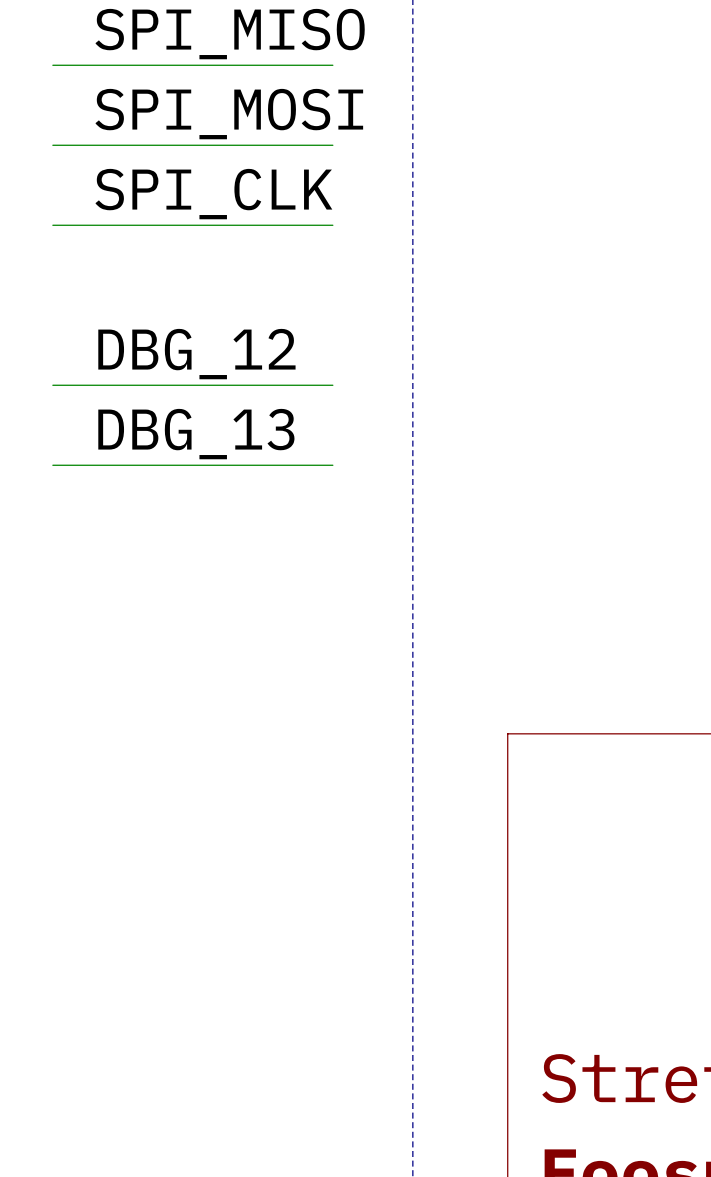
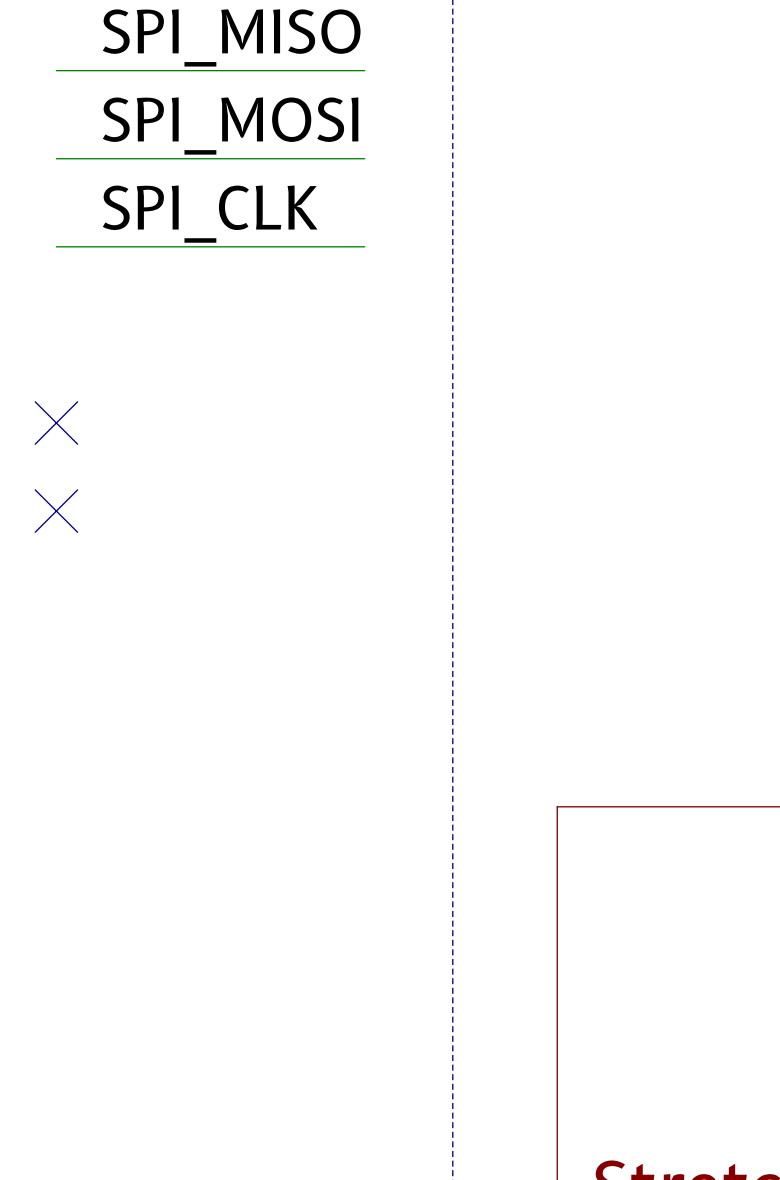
label: DBG_12 (196, 354) -> none
wire: (52, 385) (332, 385) -> none
no-connect mark: none -> (56, 422)
label: DBG_13 (196, 434) -> none
wire: (52, 465) (332, 465) -> none
no-connect mark: none -> (56, 511)

